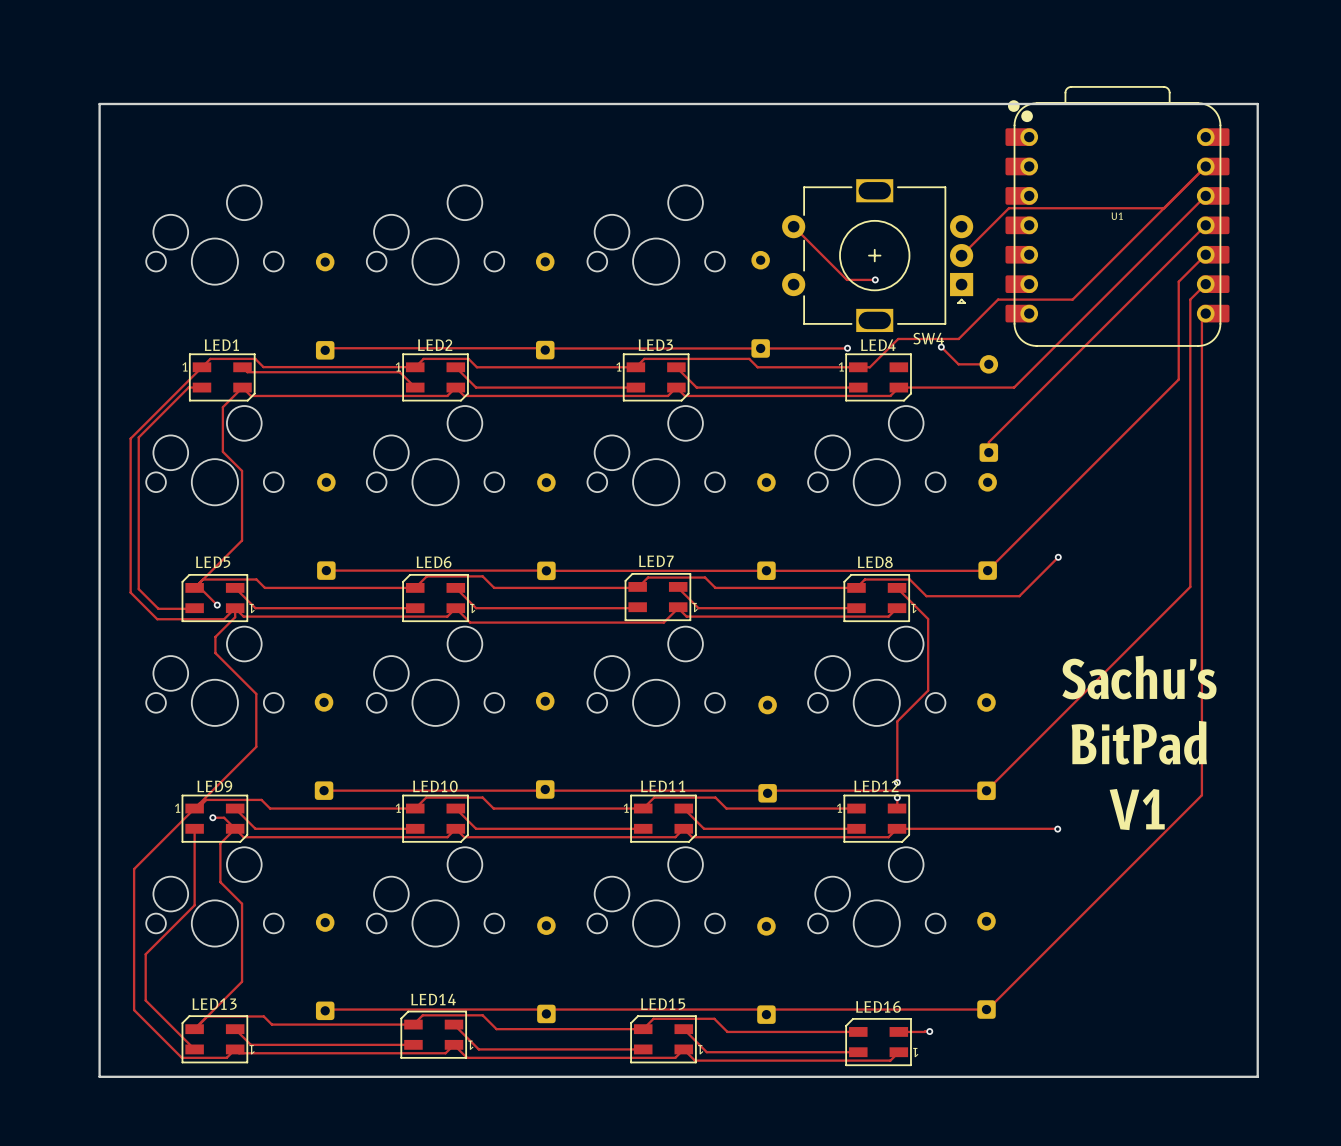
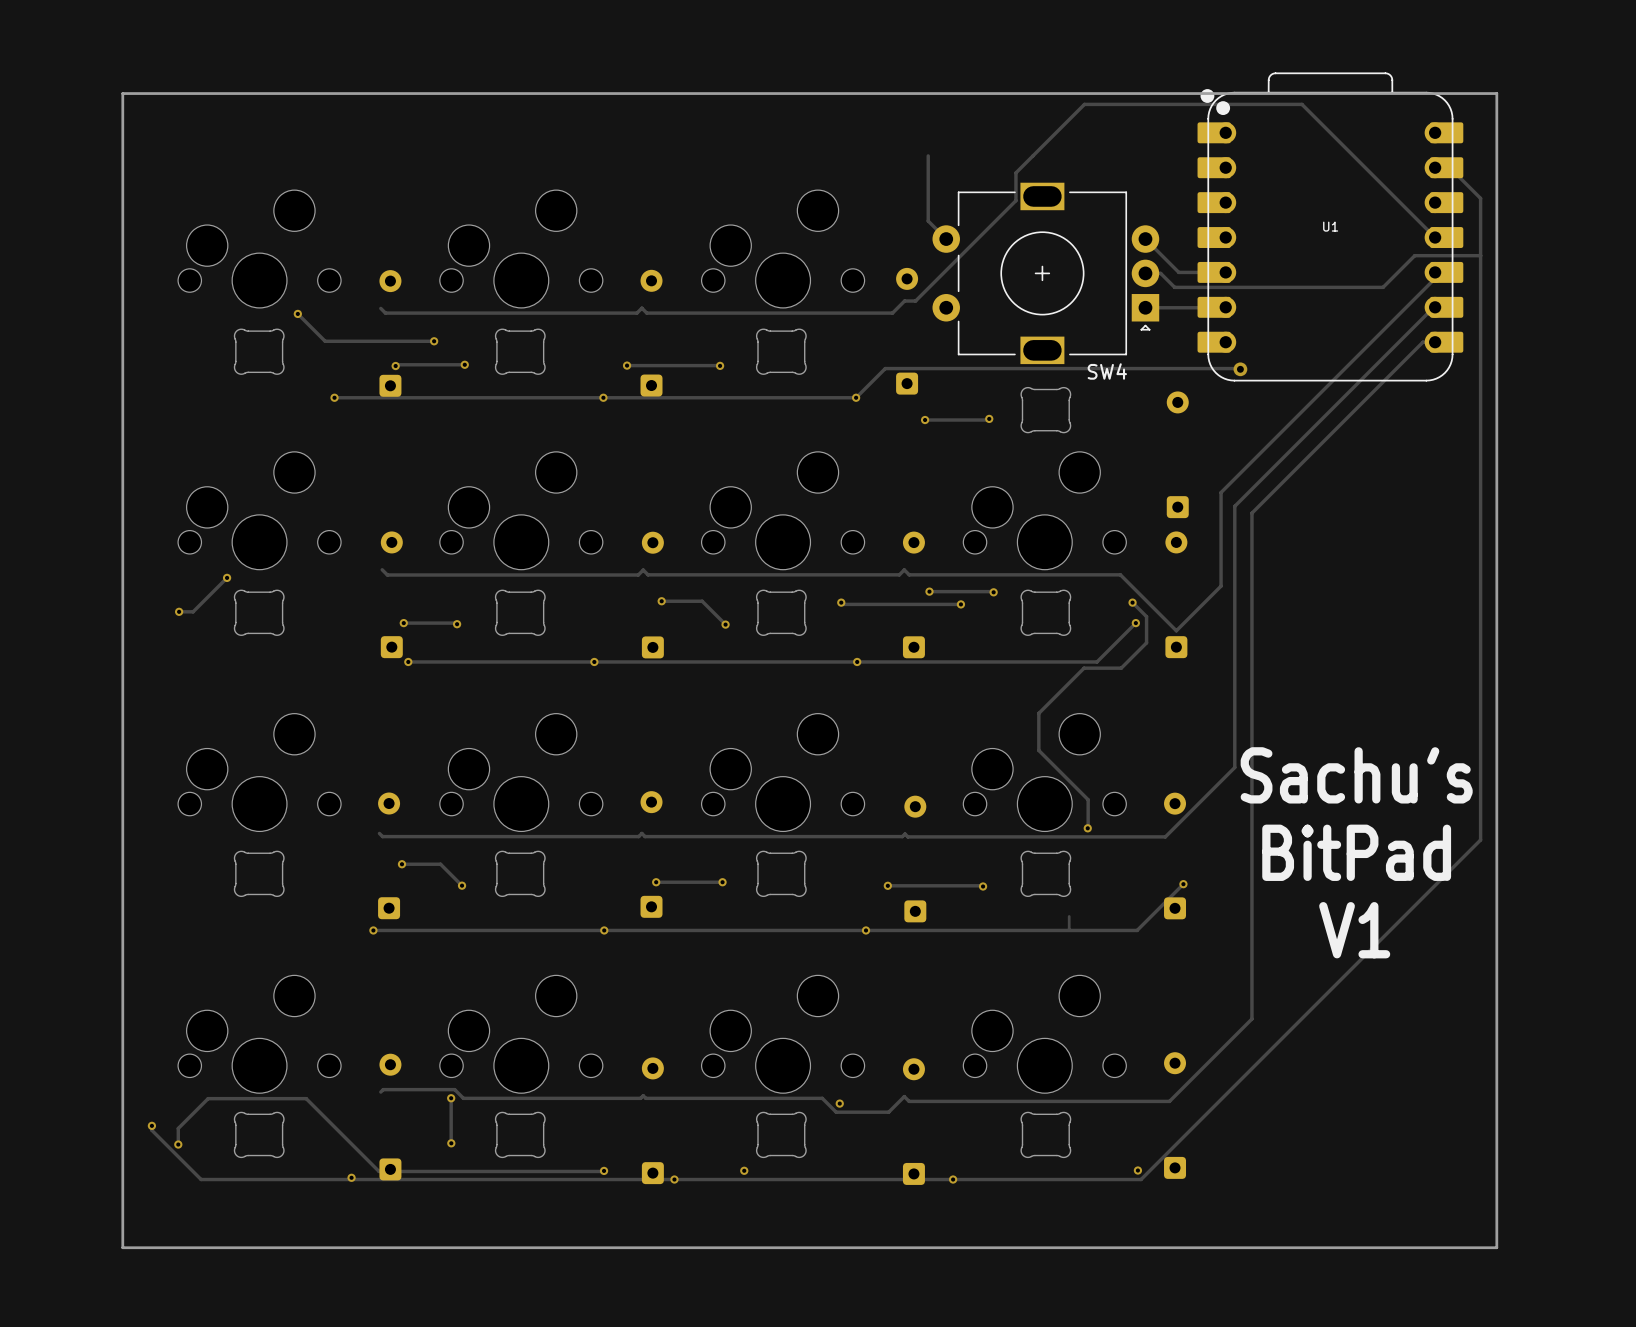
track: (1205, 166) (1072, 299) (998, 299) (958, 338) (898, 338) (869, 367) (757, 367) (749, 358) (644, 358) (635, 367) (476, 367) (468, 358) (423, 358) (415, 367) (263, 367) (255, 358) (210, 358) (130, 438) (130, 592) (157, 619) (224, 619) (235, 608) -> (1435, 167) (1449, 167) (1480, 198) (1480, 839) (1141, 1179) (201, 1179) (151, 1130) (151, 1125)
track: (1205, 195) (1014, 387) (898, 387) (890, 395) (684, 395) (676, 387) (668, 395) (464, 395) (455, 387) (447, 395) (250, 395) (242, 387) (222, 407) (222, 451) (242, 470) (242, 540) (194, 587) (200, 587) (217, 605) -> none
track: (1164, 208) (1008, 208) (961, 255) -> (1480, 255) (1414, 255) (1383, 287) (1174, 287) (1160, 273) (1145, 273)
track: (1205, 225) (988, 442) (988, 452) -> (1435, 237) (1301, 104) (1084, 104) (1015, 172) (1015, 200) (915, 301) (904, 301) (892, 313) (646, 313) (641, 308) (636, 313) (385, 313) (380, 308)
track: (793, 226) (846, 279) (875, 279) -> (946, 239) (928, 221) (928, 155)
track: none -> (1145, 239) (1178, 272) (1214, 272)
track: (1205, 254) (1178, 281) (1178, 379) (987, 570) (326, 570) -> (1435, 272) (1435, 278) (1221, 492) (1221, 586) (1176, 630) (1120, 574) (909, 574) (904, 569) (899, 574) (648, 574) (643, 570) (638, 575) (387, 575) (382, 569)
via: (875, 279) -> none
track: none -> (1214, 307) (1145, 307)
track: (1205, 284) (1190, 299) (1190, 586) (986, 790) (992, 790) -> (1435, 307) (1234, 506) (1234, 767) (1165, 836) (907, 836) (905, 834) (902, 836) (645, 836) (641, 833) (638, 836) (382, 836) (379, 833)
track: none -> (297, 313) (325, 341) (434, 341)
via: none -> (297, 313)
via: none -> (434, 341)
track: (1205, 313) (1201, 317) (1201, 795) (987, 1009) (325, 1010) -> none
track: none -> (1446, 342) (1422, 342) (1251, 513) (1251, 1018) (1169, 1101) (909, 1101) (904, 1096) (888, 1112) (836, 1112) (822, 1098) (645, 1098) (643, 1095) (640, 1098) (463, 1098) (454, 1089) (383, 1089) (380, 1092)
part: none -> (259, 351)
part: none -> (520, 351)
part: none -> (781, 351)
track: none -> (464, 364) (395, 366)
via: none -> (464, 364)
via: none -> (395, 366)
track: none -> (627, 365) (720, 365)
via: none -> (627, 365)
via: none -> (720, 365)
track: none -> (1240, 369) (885, 368) (856, 397) (334, 397)
via: none -> (1240, 369)
track: (941, 347) (958, 364) (988, 364) -> none
via: (941, 347) -> none
track: (325, 348) (847, 348) -> none
via position: (847, 348) -> (989, 418)
via: none -> (334, 397)
via: none -> (603, 397)
via: none -> (856, 397)
track: (242, 367) (247, 372) (399, 372) (415, 387) -> none
track: (455, 367) (476, 387) (635, 387) -> none
track: (676, 367) (696, 387) (858, 387) -> none
part: none -> (1045, 410)
LED1: (222, 377) -> none
LED2: (435, 377) -> none
LED3: (656, 377) -> none
LED4: (878, 377) -> none
track: none -> (989, 418) (925, 420)
via: none -> (925, 420)
track: (201, 387) (188, 387) (138, 437) (138, 589) (158, 608) (194, 608) -> none
track: none -> (227, 577) (193, 611) (179, 611)
via: none -> (227, 577)
track: none -> (929, 591) (993, 592)
via: none -> (929, 591)
via: none -> (993, 592)
track: none -> (661, 601) (702, 601) (725, 624)
via: none -> (661, 601)
track: none -> (841, 602) (843, 604) (960, 604)
via: none -> (841, 602)
track: none -> (1132, 602) (1146, 616) (1146, 642) (1121, 668) (1084, 668) (1038, 713) (1038, 750) (1088, 799) (1087, 828)
via: none -> (1132, 602)
via: none -> (960, 604)
via: none -> (179, 611)
part: none -> (259, 612)
part: none -> (520, 612)
part: none -> (781, 612)
part: none -> (1045, 612)
track: none -> (403, 623) (457, 624)
via: none -> (403, 623)
track: none -> (1135, 623) (1096, 661) (408, 661)
via: none -> (1135, 623)
via: none -> (457, 624)
via: none -> (725, 624)
track: (1058, 557) (1019, 596) (926, 596) (909, 579) (864, 579) (856, 587) (715, 587) (705, 577) (648, 577) (637, 587) (494, 587) (482, 576) (426, 576) (415, 587) (264, 587) (256, 579) (203, 579) -> none
via: (1058, 557) -> none
via: none -> (408, 661)
via: none -> (594, 661)
via: none -> (857, 661)
track: (235, 587) (255, 608) (415, 608) -> none
track: (455, 587) (476, 608) (637, 608) -> none
track: (678, 587) (698, 608) (856, 608) -> none
track: (897, 587) (928, 619) (928, 690) (897, 721) (897, 782) -> none
LED7: (657, 597) -> none
LED5: (214, 598) -> none
LED6: (435, 598) -> none
LED8: (876, 598) -> none
via: (217, 605) -> none
track: (235, 608) (235, 617) (215, 636) (215, 653) (256, 693) (256, 746) (134, 869) (134, 1010) (181, 1057) (226, 1057) (235, 1049) (238, 1053) (445, 1053) (453, 1044) (466, 1057) (675, 1057) (683, 1049) (694, 1060) (890, 1060) (898, 1052) -> none
track: (235, 608) (243, 616) (447, 616) (455, 608) (470, 622) (663, 622) (678, 608) (686, 616) (888, 616) (897, 608) -> none
via: none -> (1087, 828)
track: none -> (401, 864) (440, 864) (462, 885)
via: none -> (401, 864)
part: none -> (259, 873)
part: none -> (520, 873)
part: none -> (781, 873)
part: none -> (1045, 873)
track: none -> (656, 882) (722, 882)
via: none -> (656, 882)
via: none -> (722, 882)
track: none -> (1183, 884) (1137, 930) (373, 930)
via: none -> (1183, 884)
via: none -> (462, 885)
track: none -> (887, 885) (983, 886)
via: none -> (887, 885)
via: none -> (983, 886)
via: (897, 782) -> none
track: (324, 790) (986, 790) -> none
via: (897, 797) -> none
track: (199, 803) (206, 799) (261, 799) (270, 808) (415, 808) (426, 797) (482, 797) (493, 808) (643, 808) (654, 797) (715, 797) (726, 808) (856, 808) -> none
track: (235, 808) (255, 828) (415, 828) -> none
track: (455, 808) (476, 828) (643, 828) -> none
track: (683, 808) (704, 828) (856, 828) -> none
via: none -> (373, 930)
via: none -> (604, 930)
via: none -> (865, 930)
track: (212, 817) (224, 817) (243, 837) (447, 837) (455, 828) (464, 837) (675, 837) (683, 828) (692, 837) (888, 837) (897, 828) (1057, 829) -> none
via: (212, 817) -> none
LED9: (214, 818) -> none
LED10: (435, 818) -> none
LED11: (663, 818) -> none
LED12: (876, 818) -> none
track: (194, 828) (194, 905) (145, 954) (145, 1000) (194, 1049) -> none
track: (235, 828) (220, 843) (220, 882) (242, 903) (242, 981) (194, 1029) -> none
via: (1057, 829) -> none
track: none -> (451, 1098) (451, 1143)
via: none -> (451, 1098)
via: none -> (839, 1103)
via: none -> (151, 1125)
part: none -> (259, 1134)
part: none -> (520, 1134)
part: none -> (781, 1134)
part: none -> (1045, 1134)
via: none -> (451, 1143)
track: none -> (178, 1144) (178, 1128) (208, 1098) (306, 1098) (379, 1171) (604, 1170)
via: none -> (178, 1144)
via: none -> (744, 1170)
via: none -> (604, 1170)
track: (207, 1016) (263, 1016) (271, 1024) (413, 1024) (422, 1015) (482, 1015) (496, 1029) (643, 1029) (653, 1018) (714, 1018) (727, 1031) (858, 1031) -> none
via: none -> (351, 1177)
via: none -> (674, 1179)
via: none -> (953, 1179)
track: (453, 1024) (478, 1049) (643, 1049) -> none
track: (235, 1029) (250, 1044) (413, 1044) -> none
track: (683, 1029) (706, 1052) (858, 1052) -> none
track: (929, 1031) (898, 1031) -> none
via position: (929, 1031) -> (1137, 1170)
LED14: (433, 1034) -> none
LED13: (214, 1039) -> none
LED15: (663, 1039) -> none
LED16: (878, 1042) -> none

